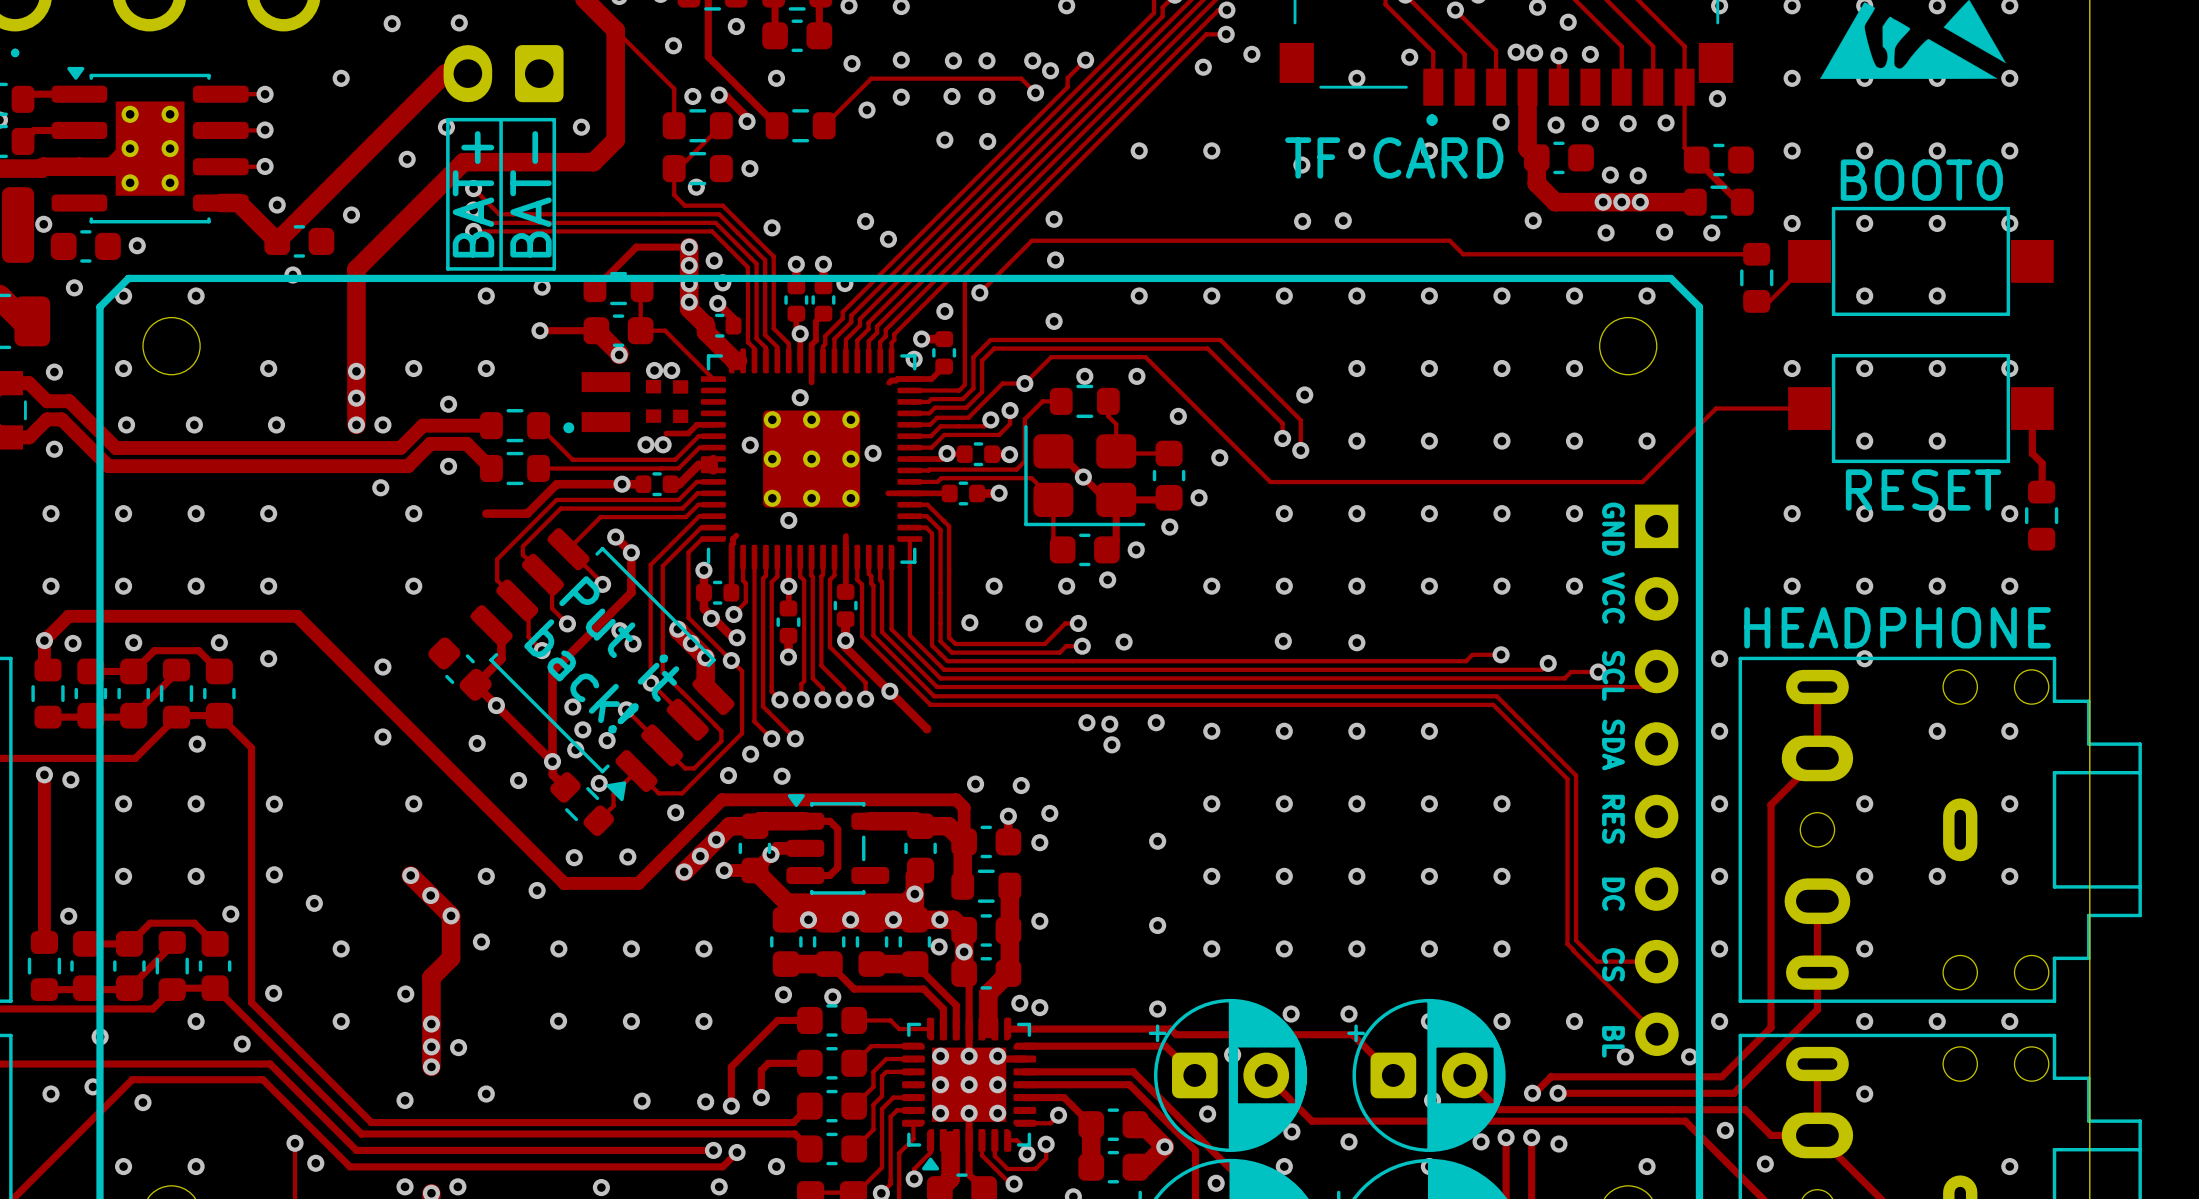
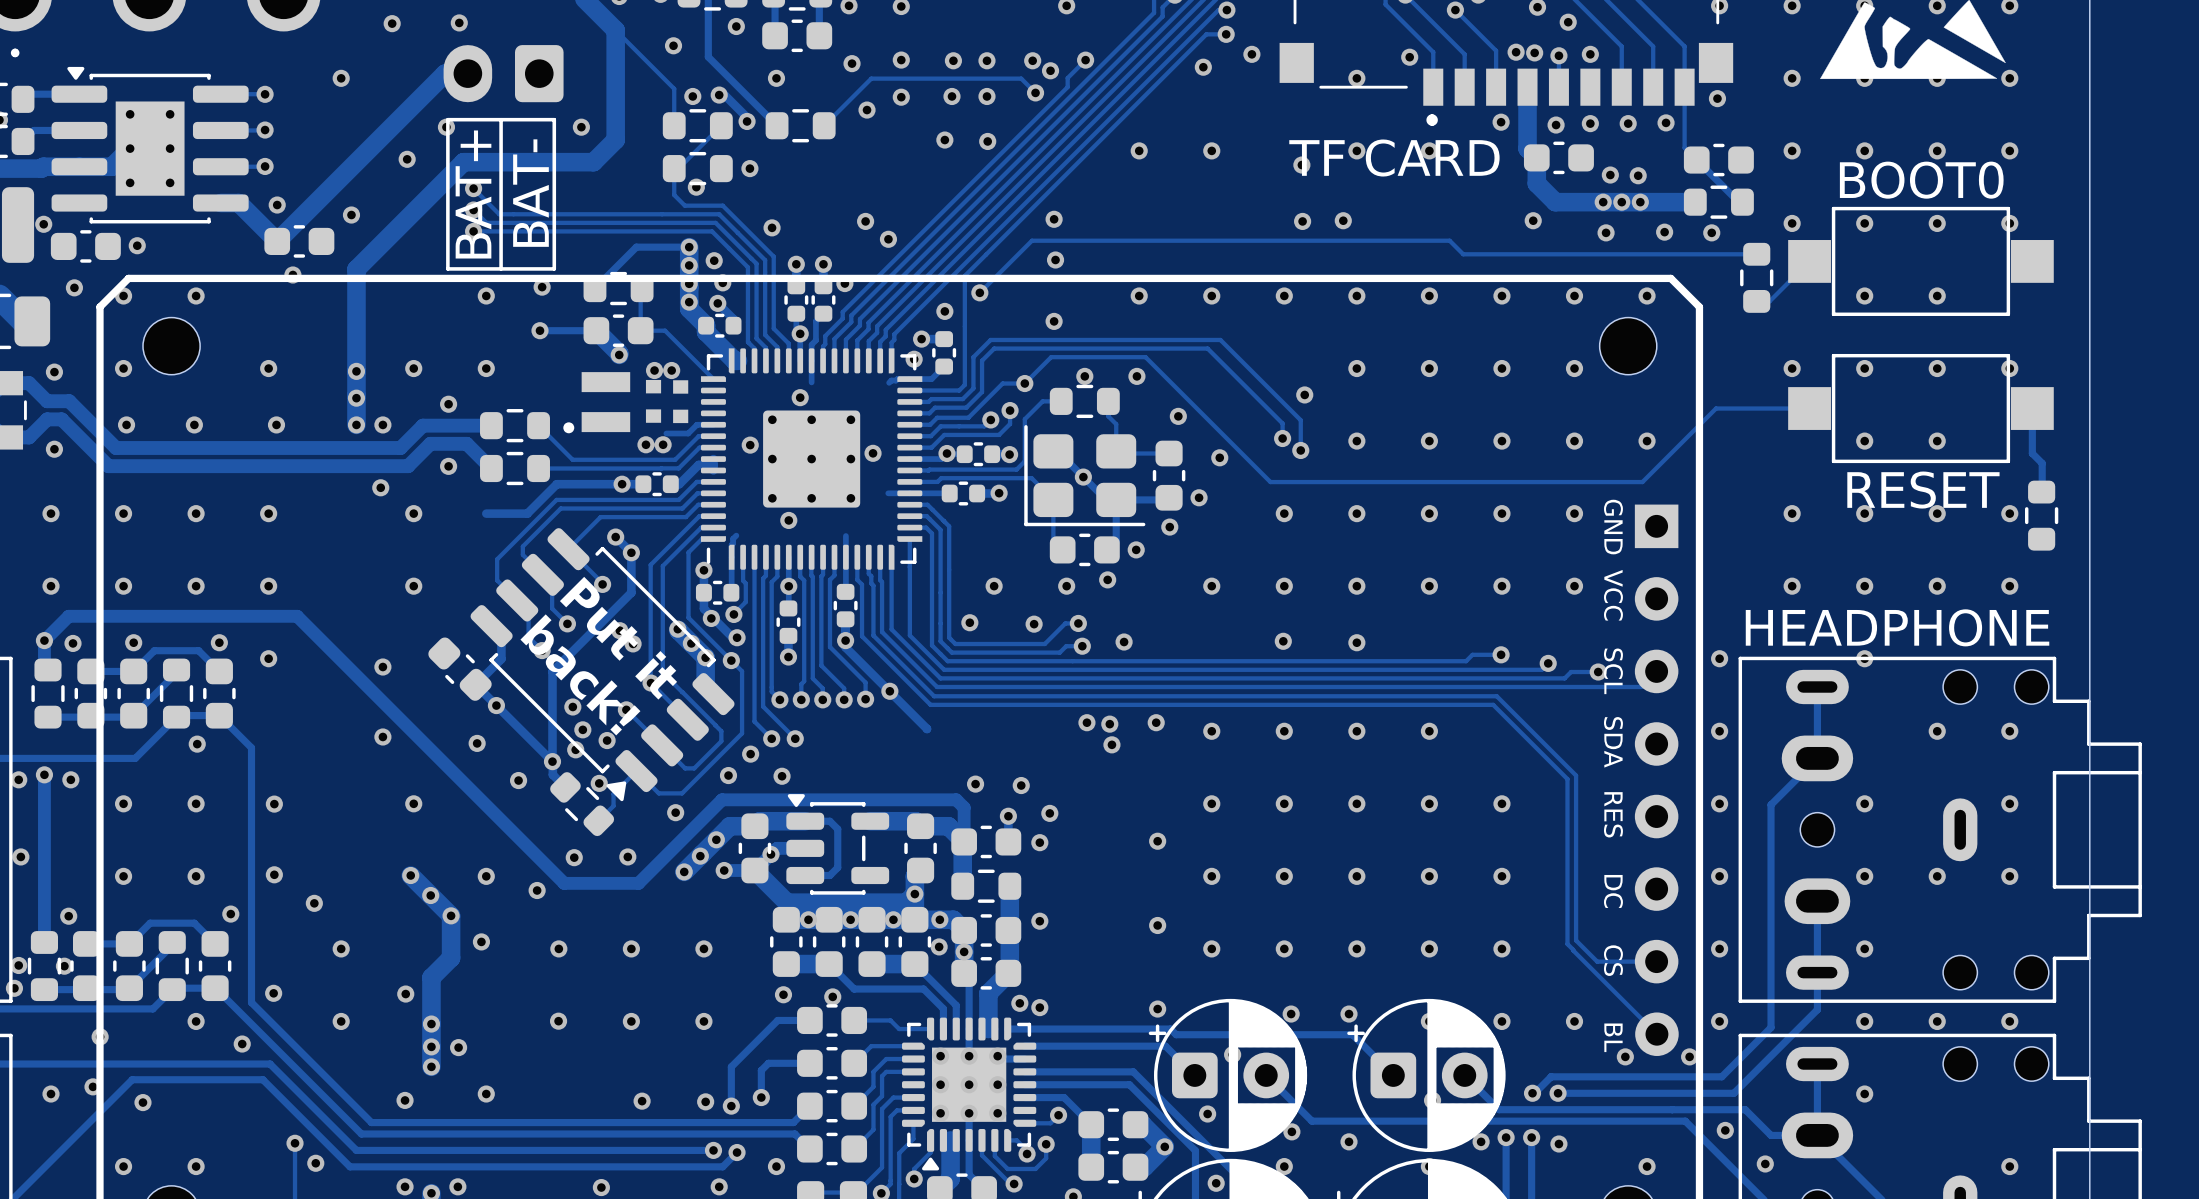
via: none -> (18, 779)
via: none -> (20, 856)
via: none -> (18, 965)
via: none -> (64, 966)
via: none -> (14, 988)

